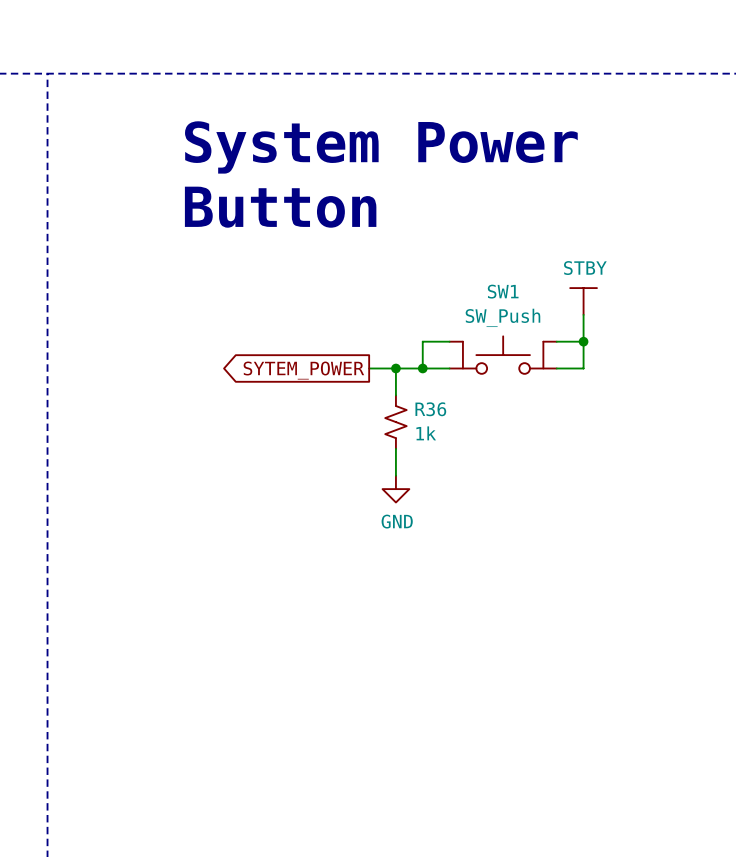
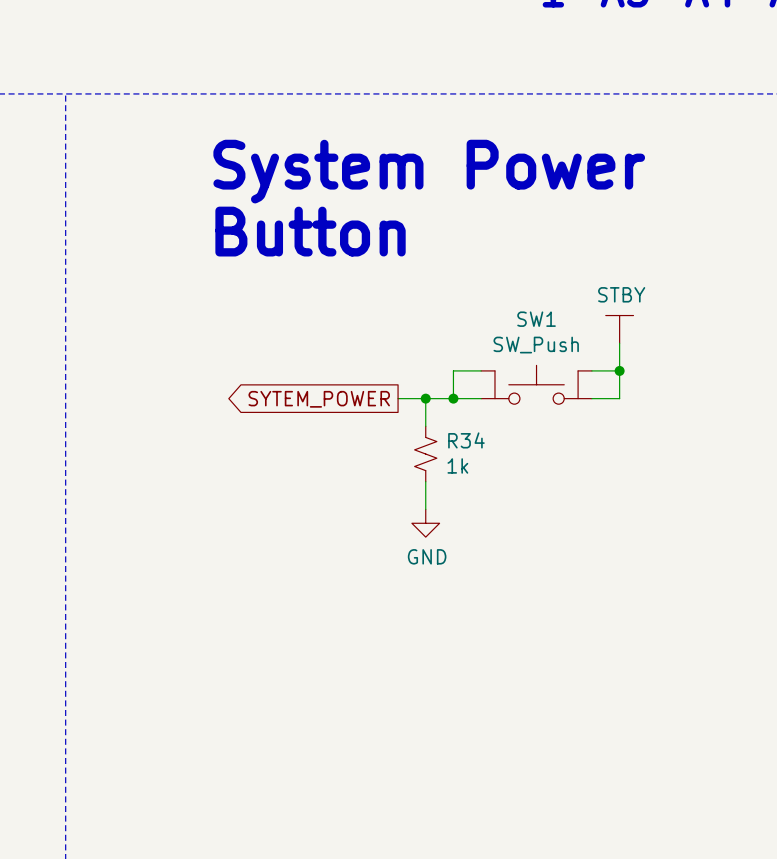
R36 name: R36 (430, 409) -> R34 (466, 440)

